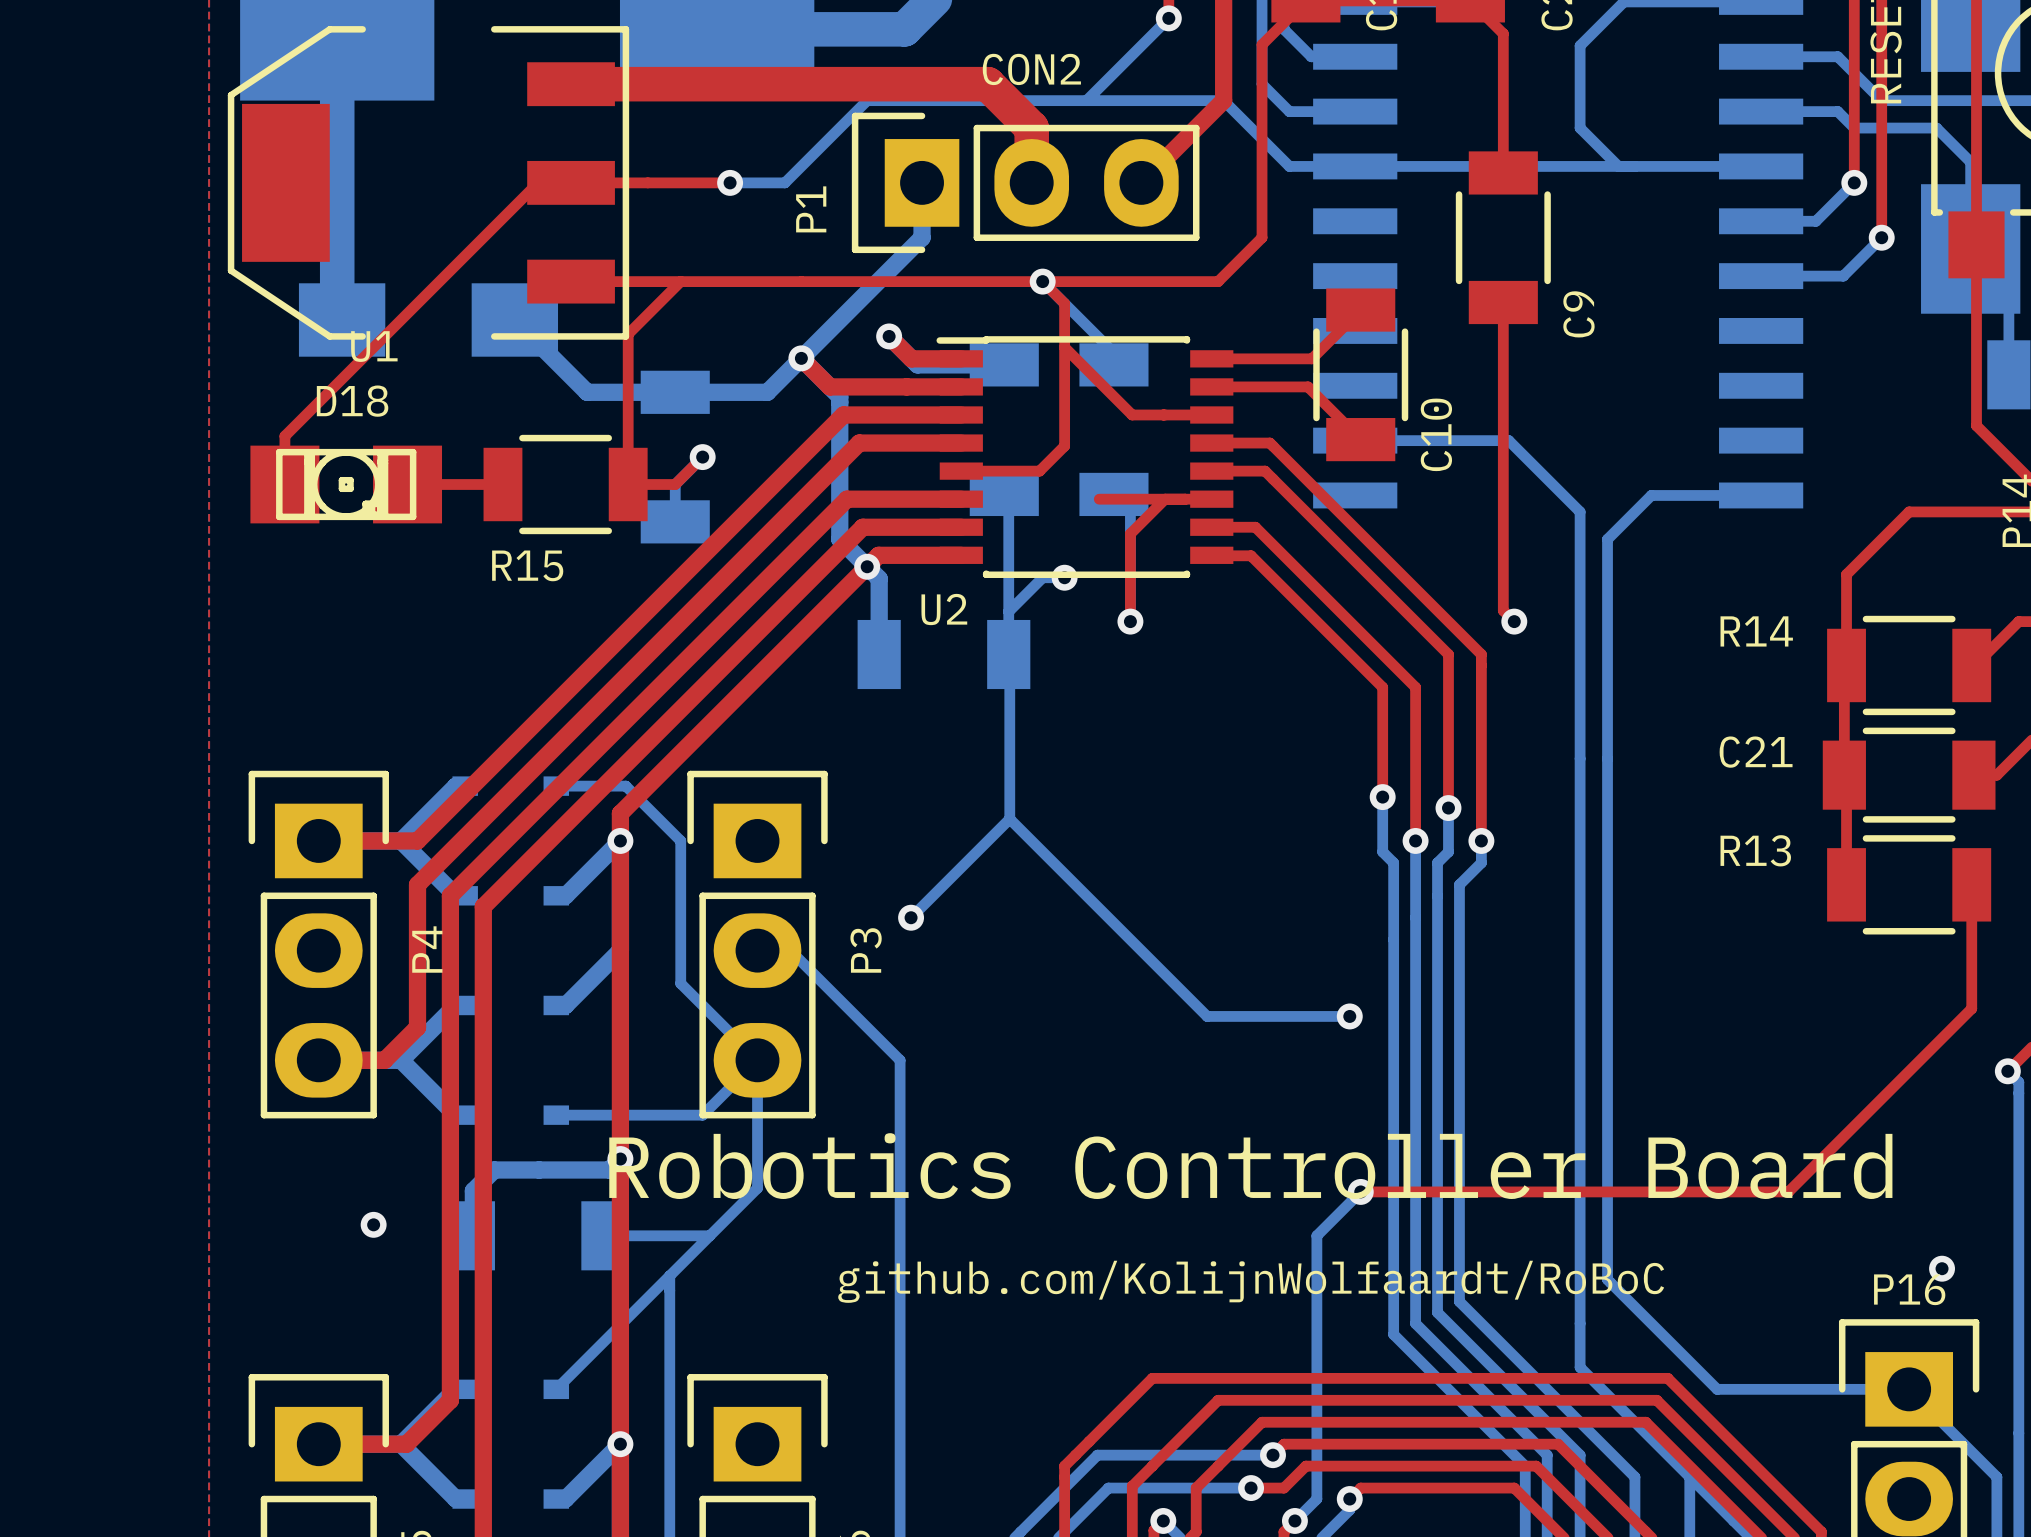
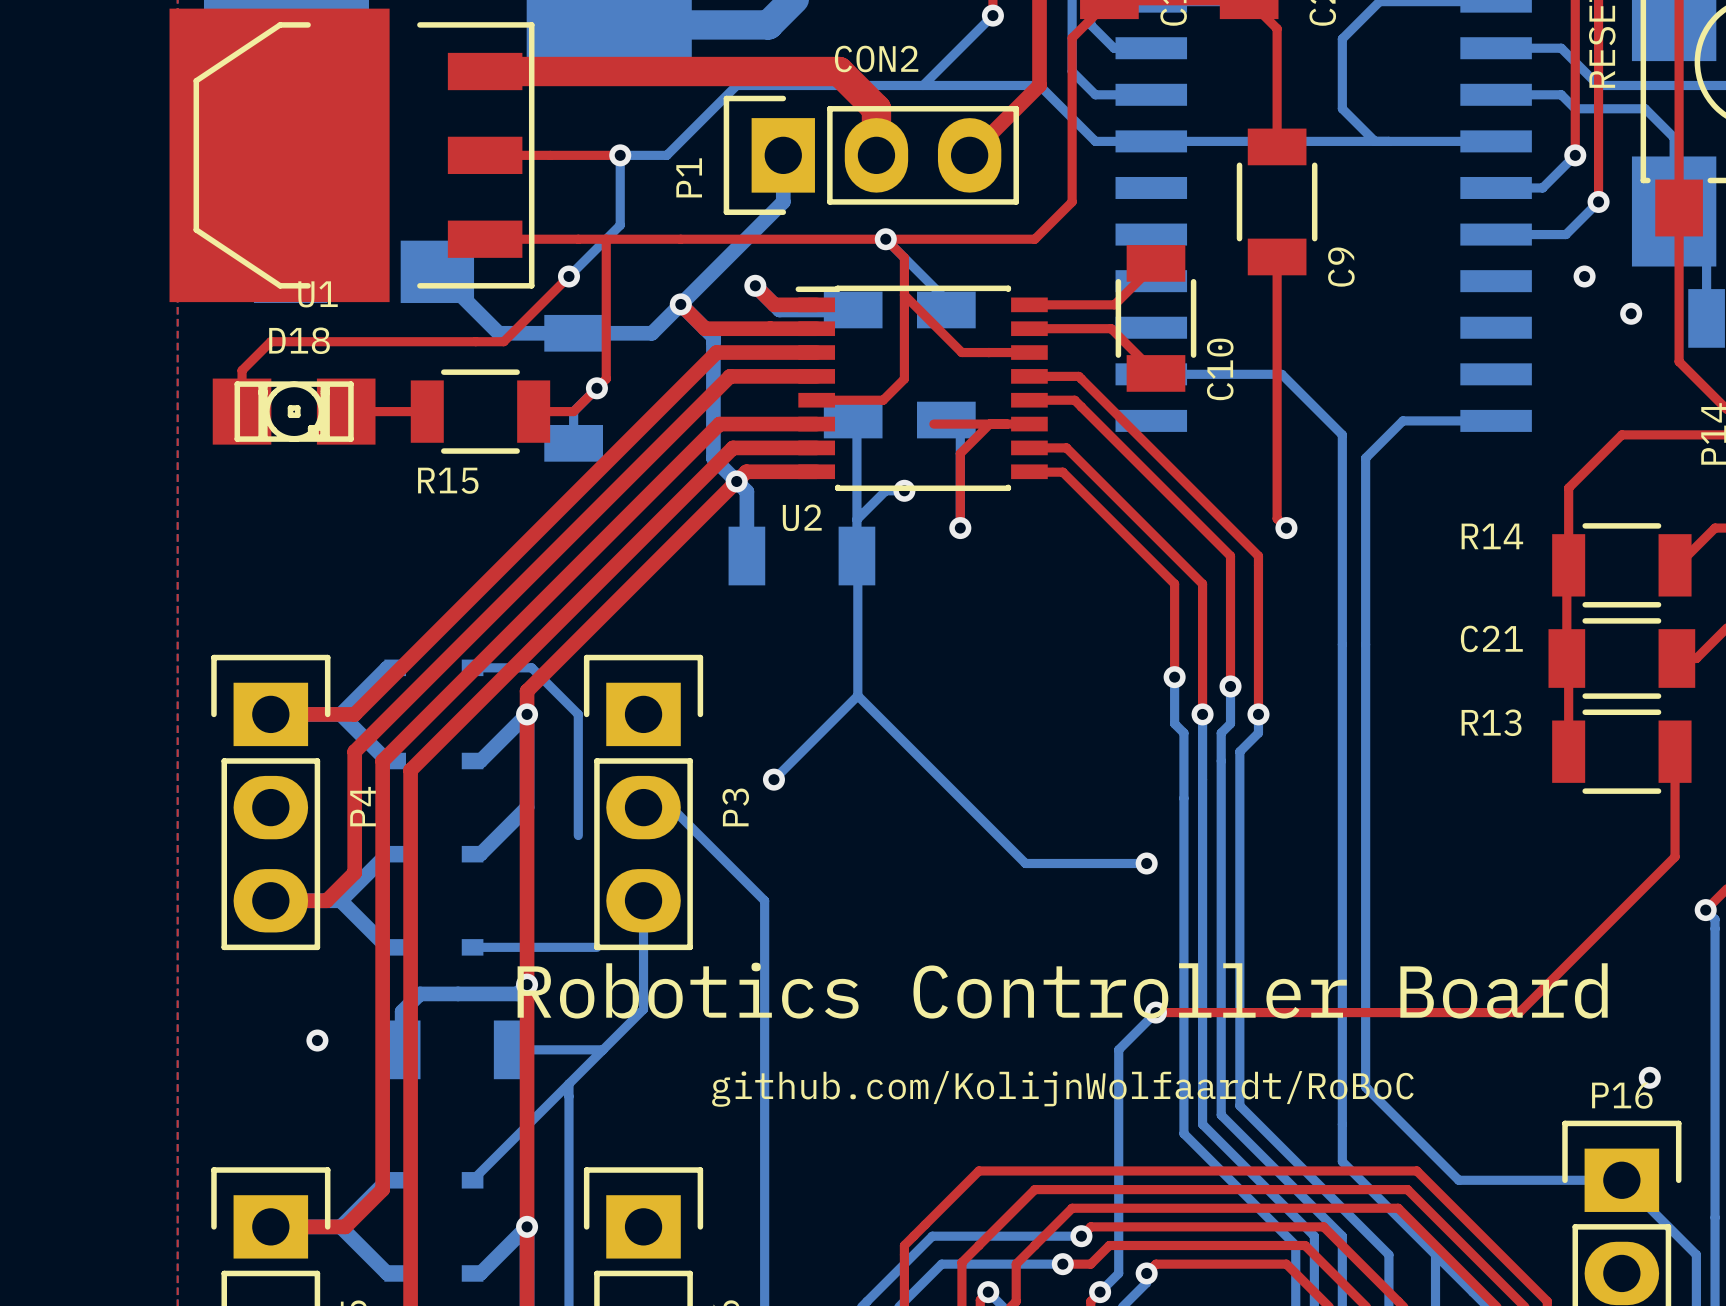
U1 footprint: [227, 26, 630, 340] -> [169, 8, 535, 303]
top track: (538, 182) (318, 402) -> (568, 276) (503, 341) (270, 341)
bottom track: none -> (620, 155) (620, 225) (568, 276)
top track: (680, 281) (628, 334) (628, 484) -> none
top track: none -> (606, 239) (606, 378) (596, 388)
via: none -> (568, 276)
via: none -> (1584, 276)
via: none -> (1631, 313)
bottom track: (680, 983) (757, 1060) (702, 1115) -> none

